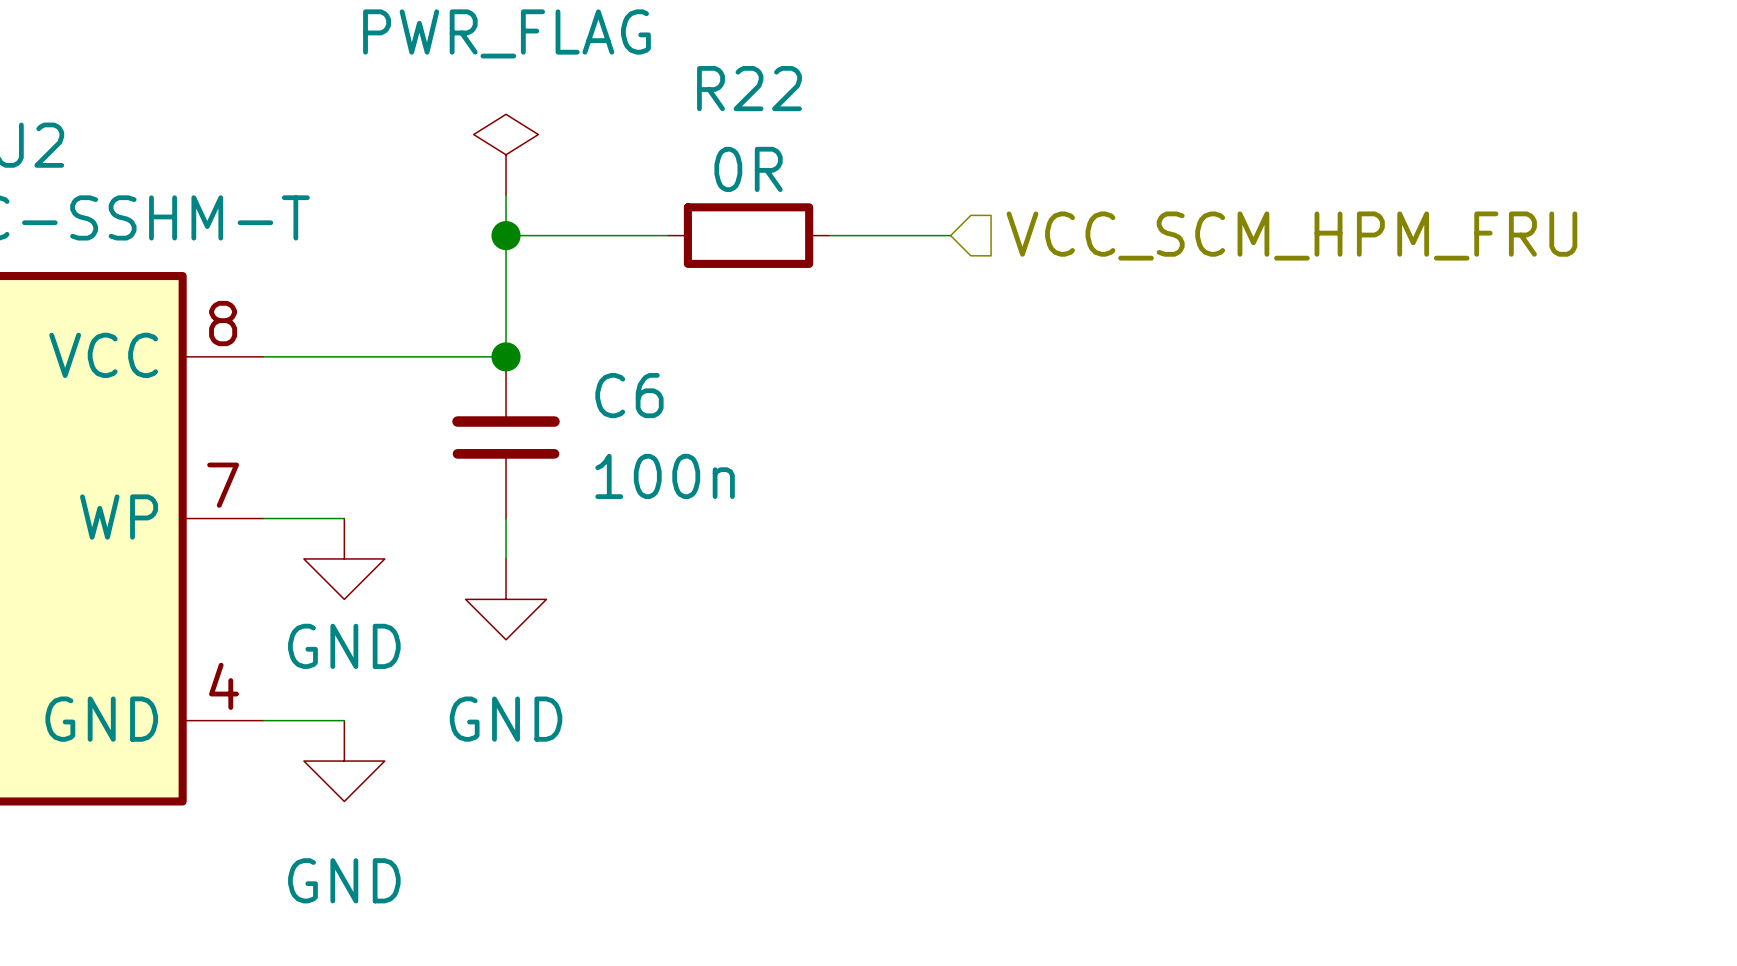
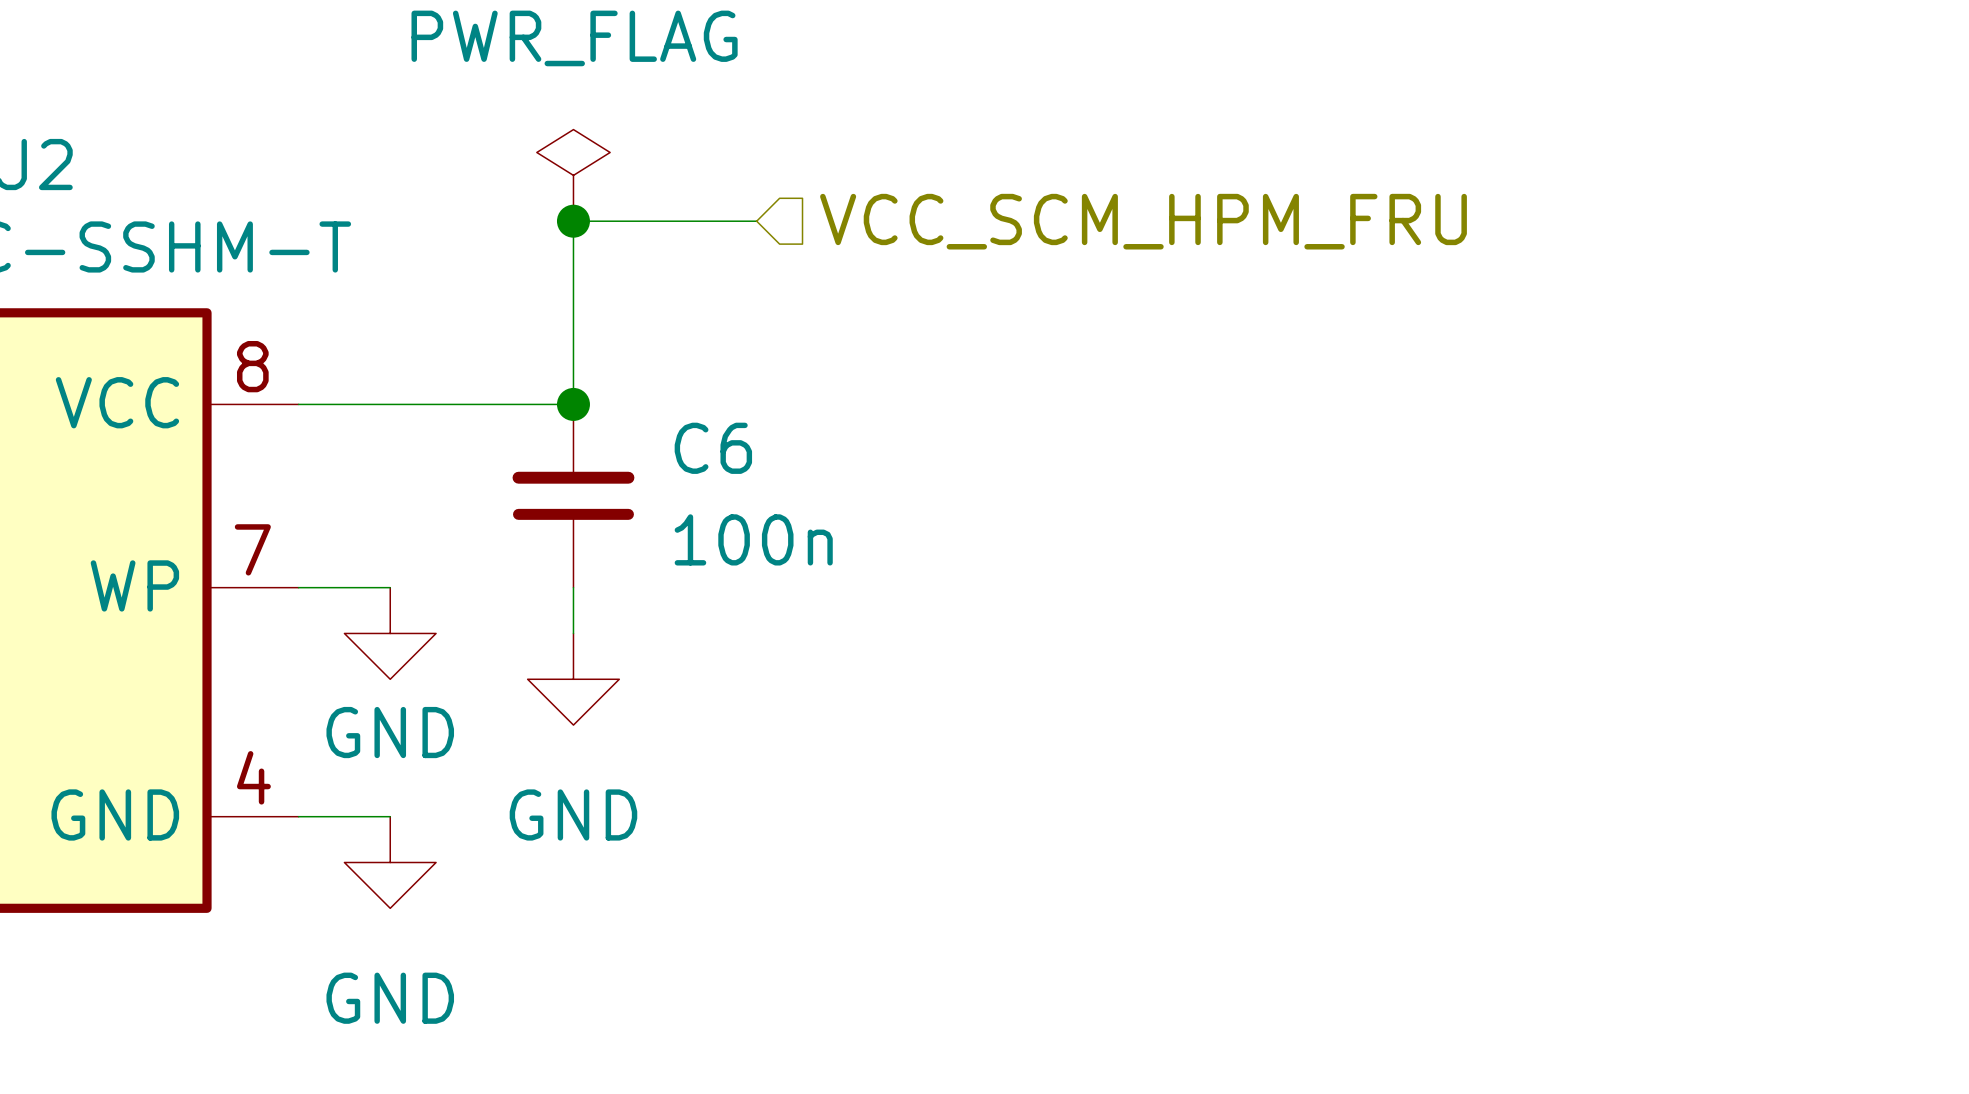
wire: (506, 235) (667, 235) -> (573, 221) (756, 221)
junction position: (506, 235) -> (573, 221)
R22: (748, 235) -> none
wire: (829, 235) (950, 235) -> none
hierarchical label position: VCC_SCM_HPM_FRU (1291, 236) -> VCC_SCM_HPM_FRU (1143, 221)

